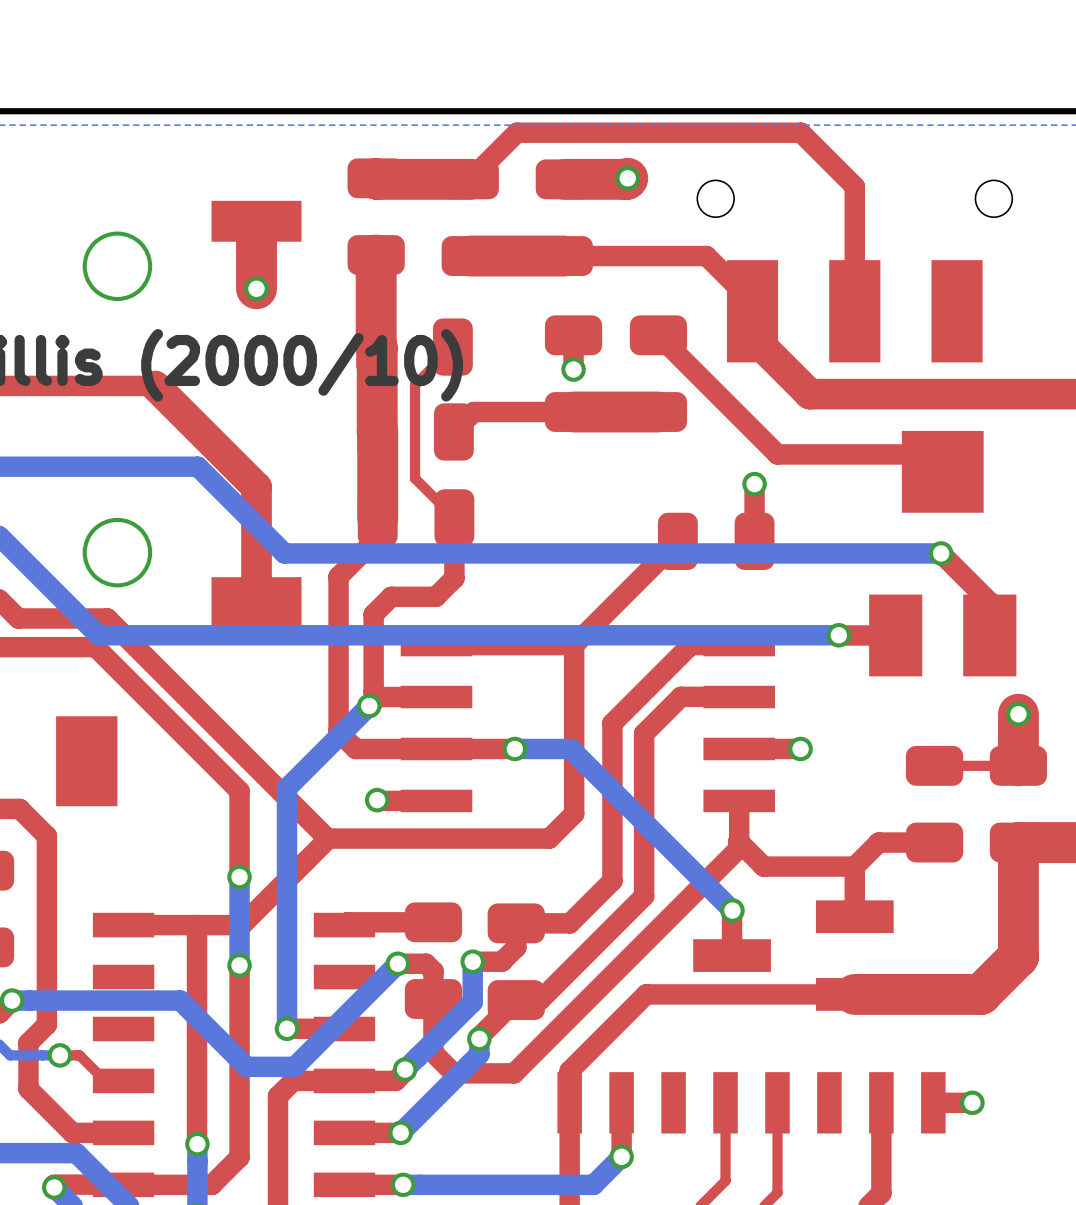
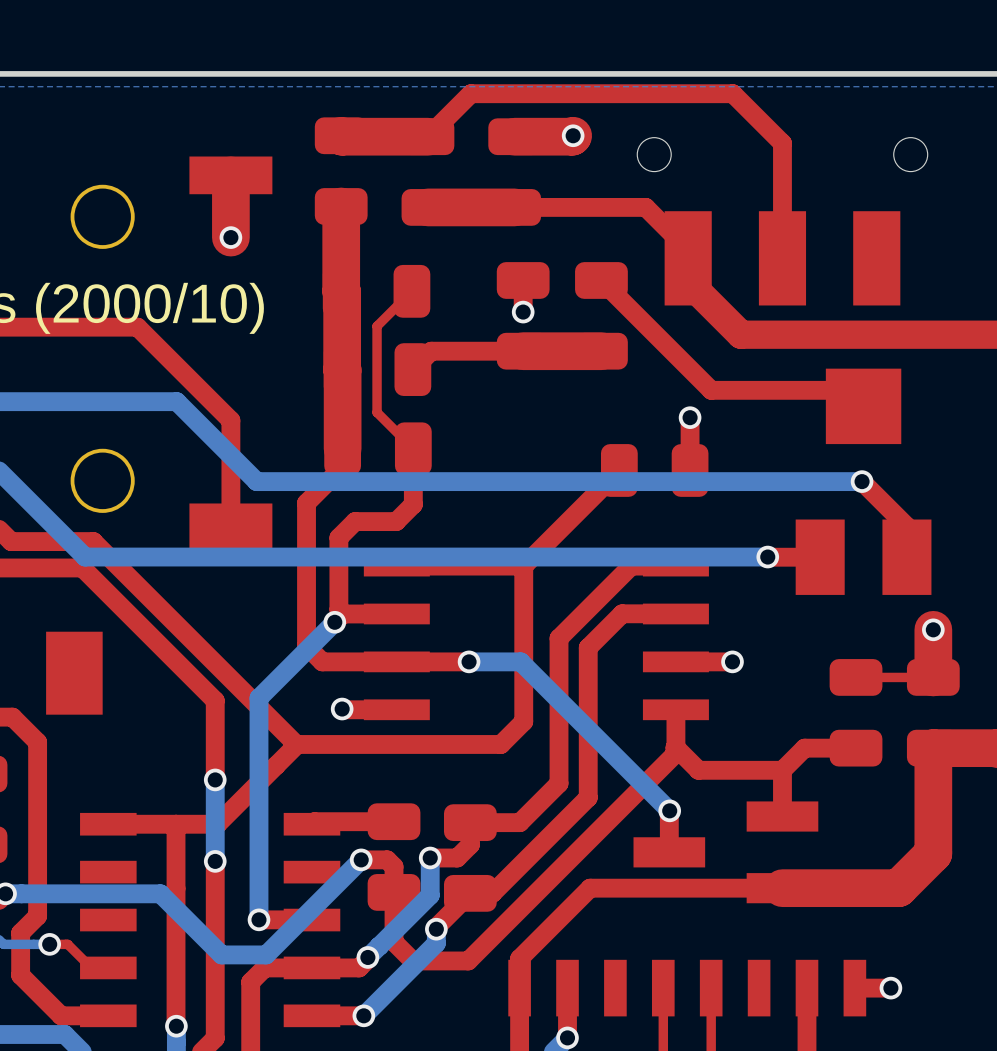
top track width: thick (155, 385) (256, 487) (256, 607) -> thin (137, 327) (230, 420) (230, 531)

